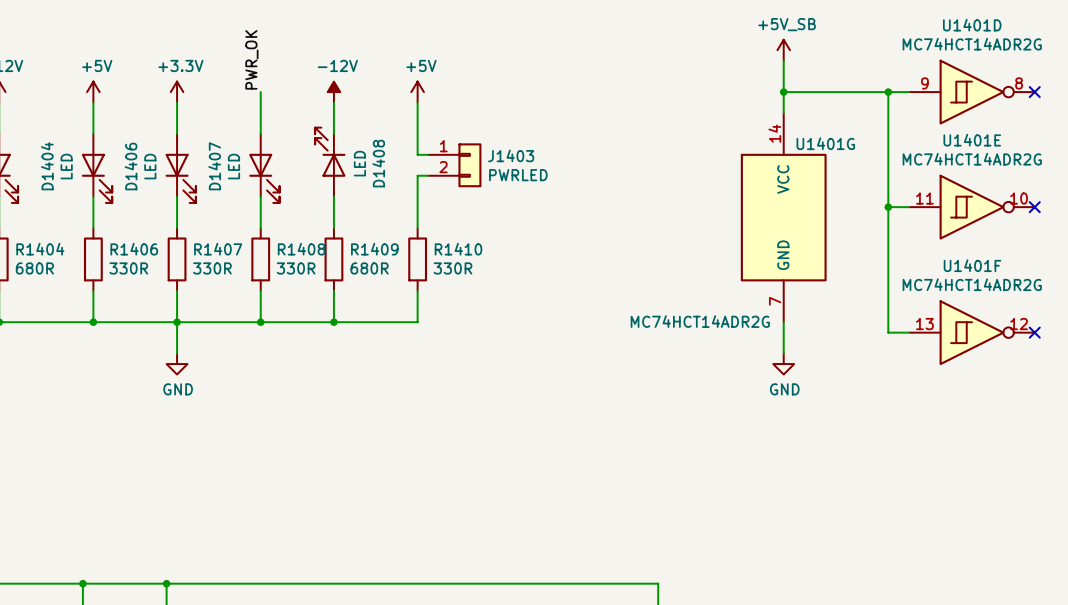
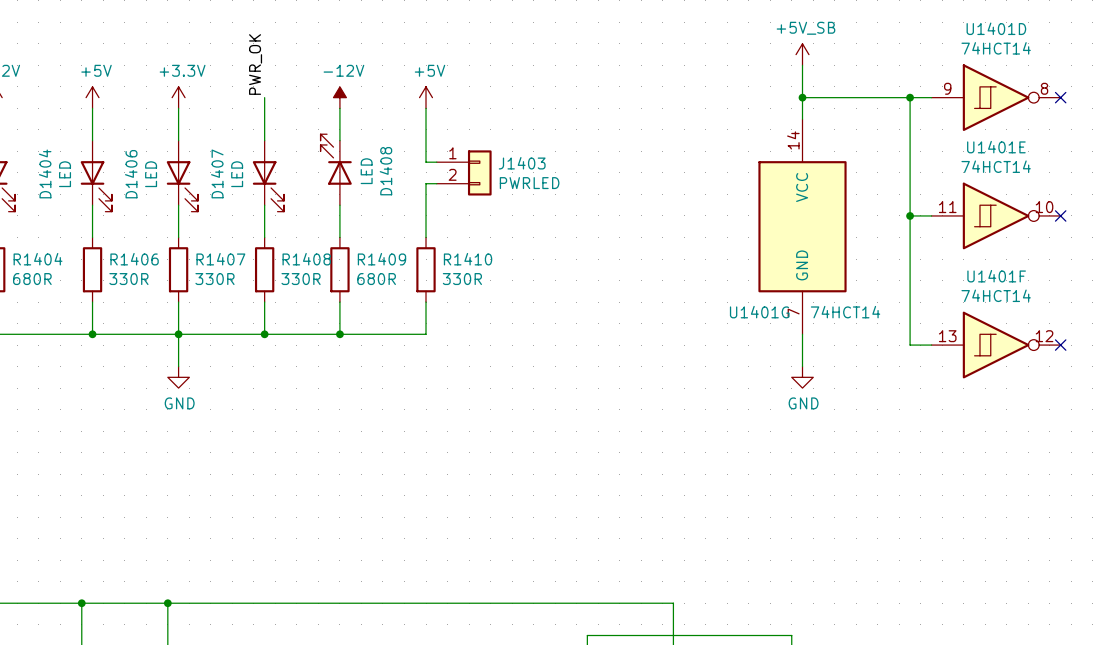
U1401D value: MC74HCT14ADR2G (972, 44) -> 74HCT14 (996, 48)
U1401G name position: U1401G (825, 143) -> U1401G (759, 312)
U1401E value: MC74HCT14ADR2G (972, 159) -> 74HCT14 (996, 166)
U1401F value: MC74HCT14ADR2G (972, 284) -> 74HCT14 (996, 295)
U1401G value: MC74HCT14ADR2G (700, 321) -> 74HCT14 (845, 312)

